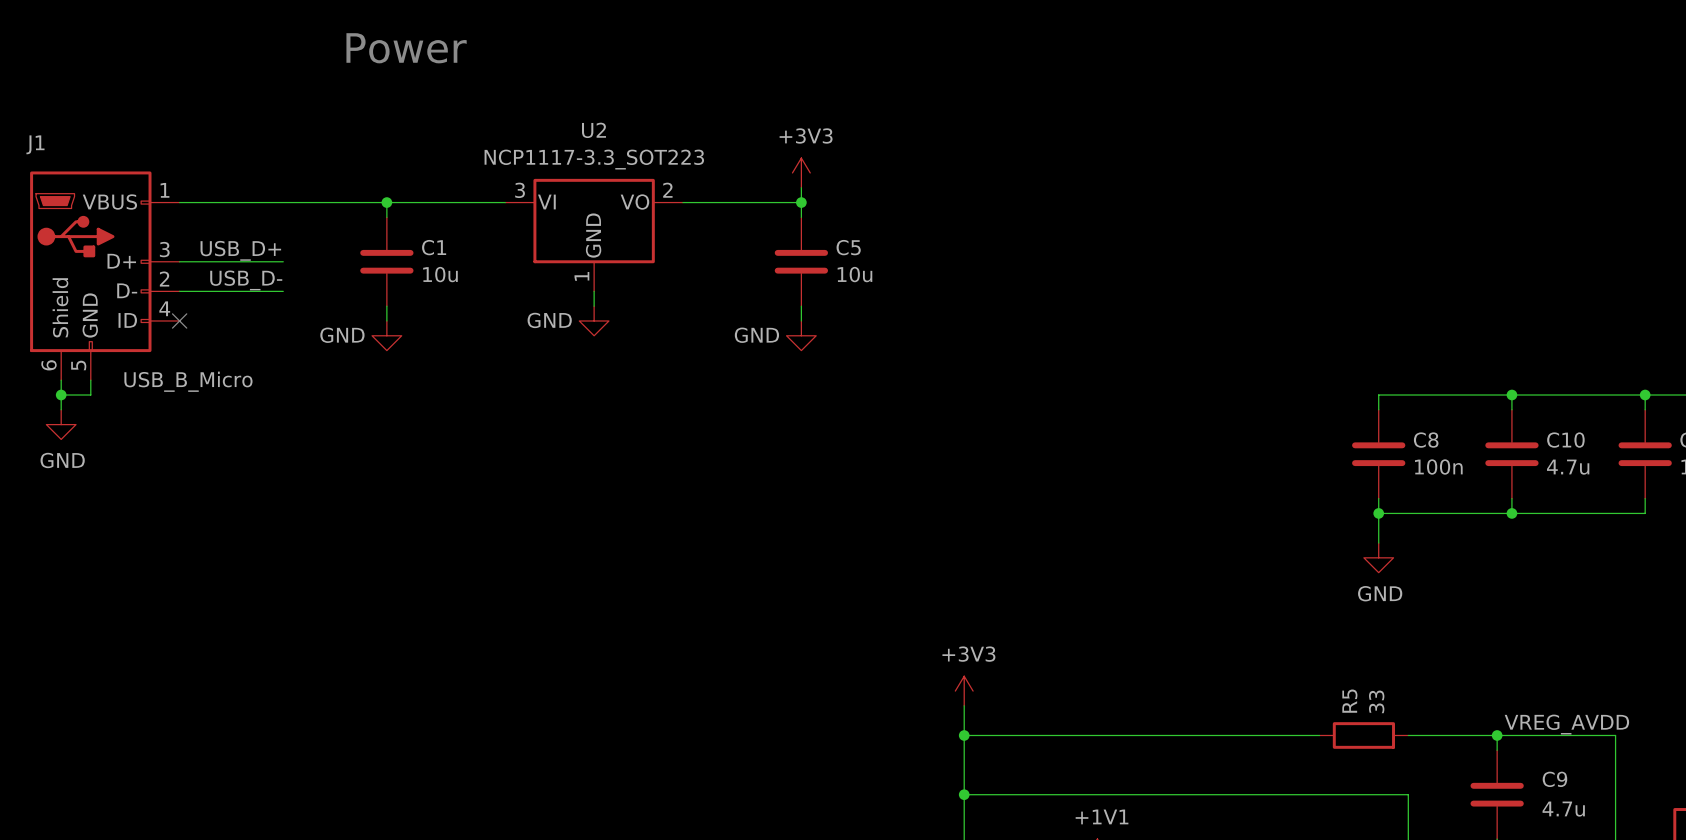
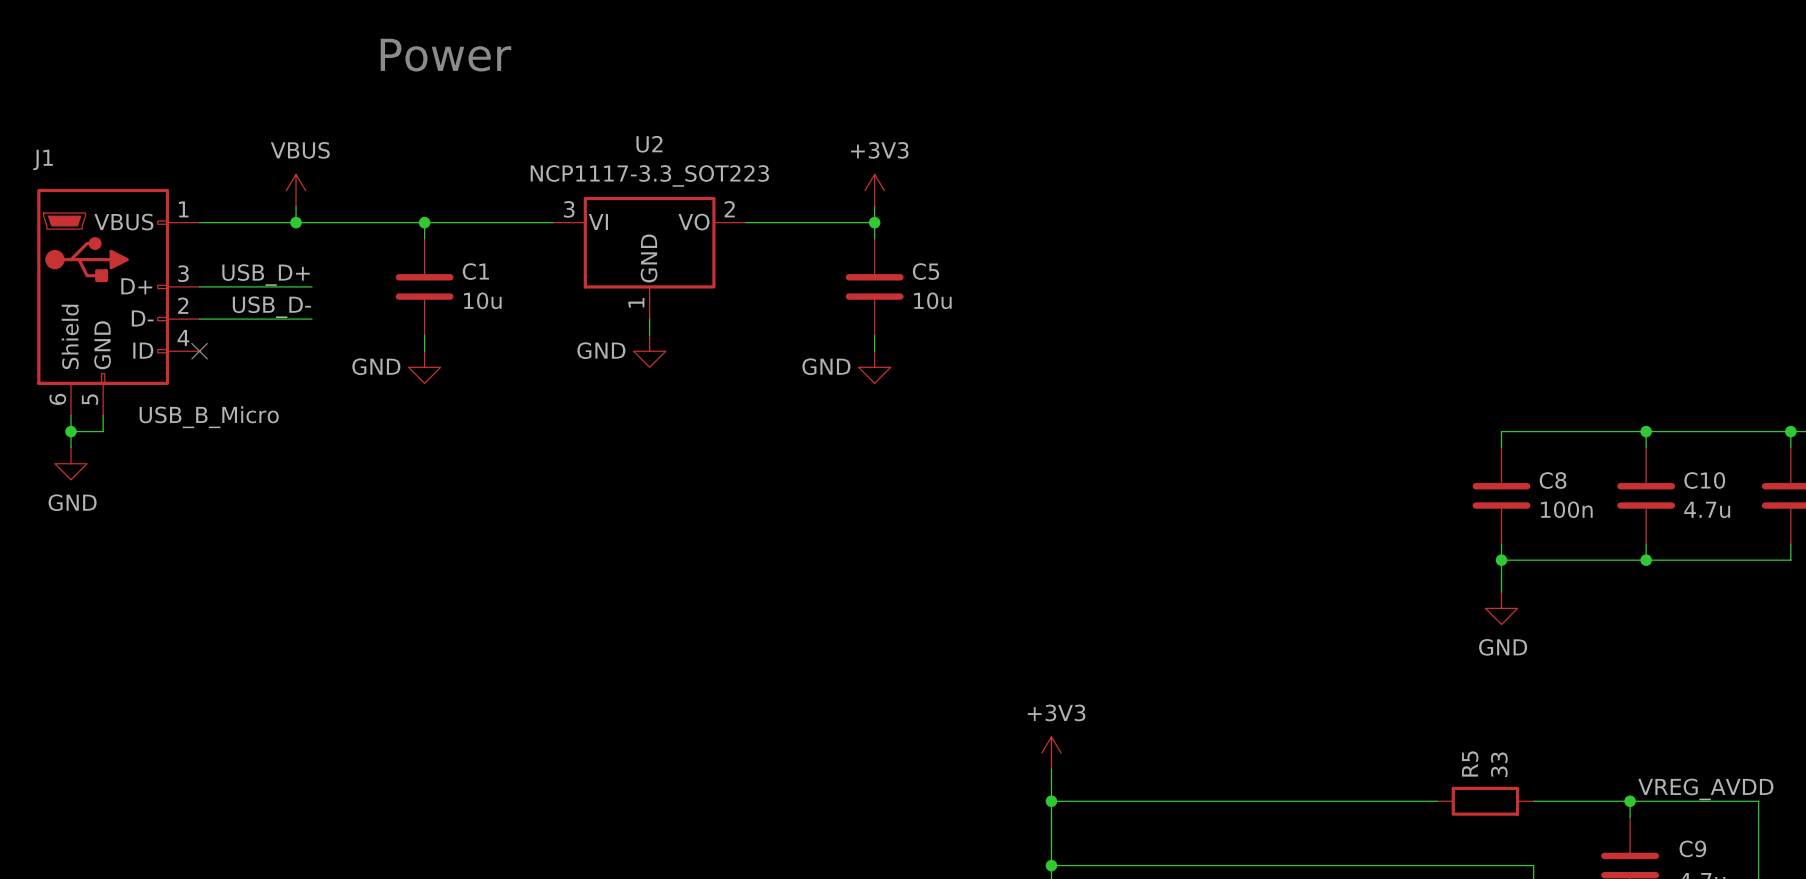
power symbol: none -> VBUS (296, 190)
wire: none -> (296, 206) (296, 222)
junction: none -> (296, 222)

